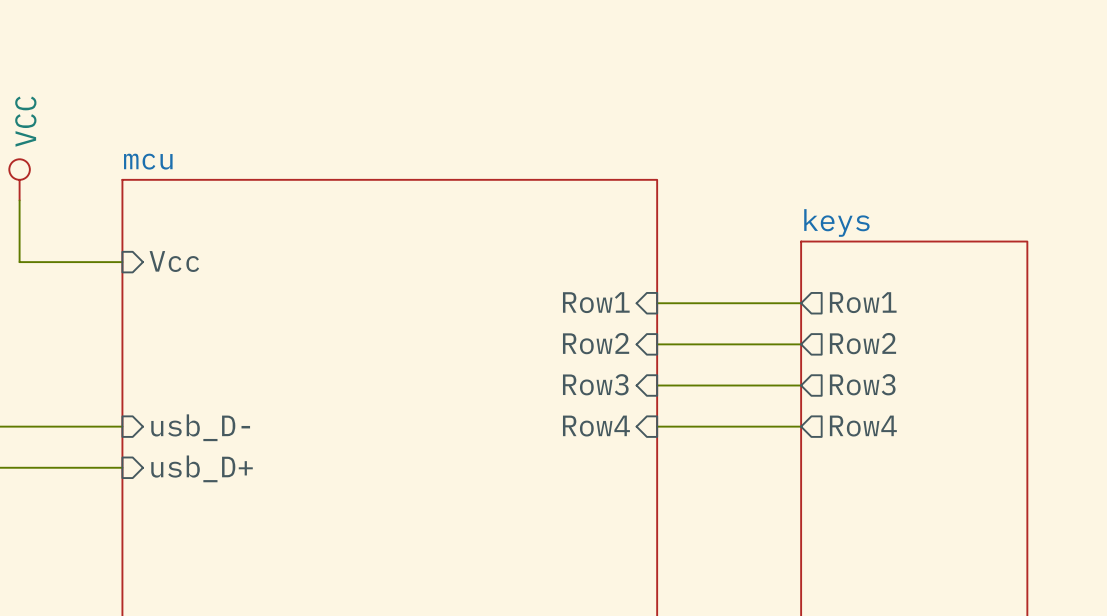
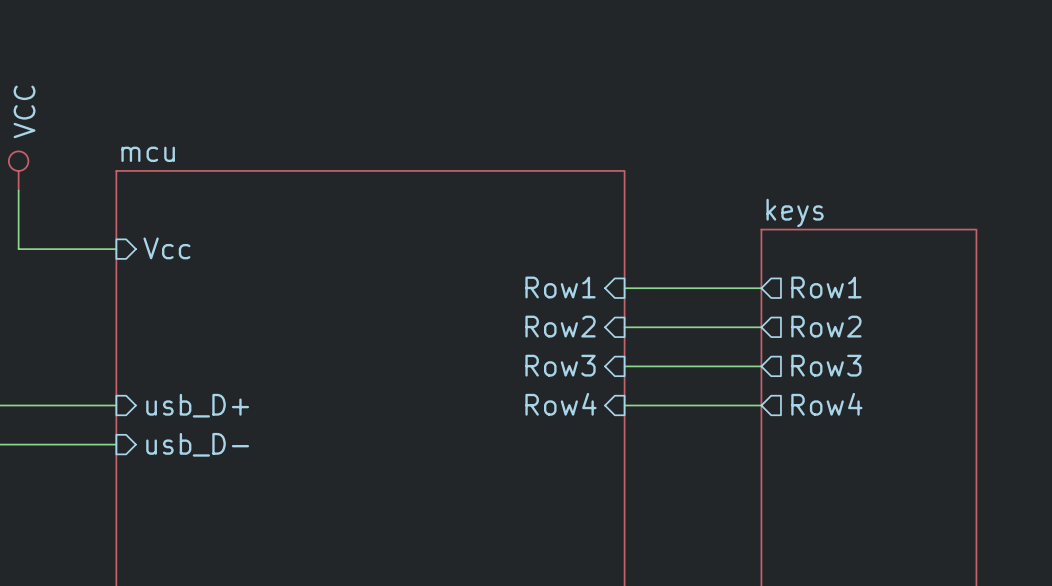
sheet pin: usb_D- (200, 427) -> usb_D+ (197, 405)
sheet pin: usb_D+ (202, 468) -> usb_D- (197, 444)

